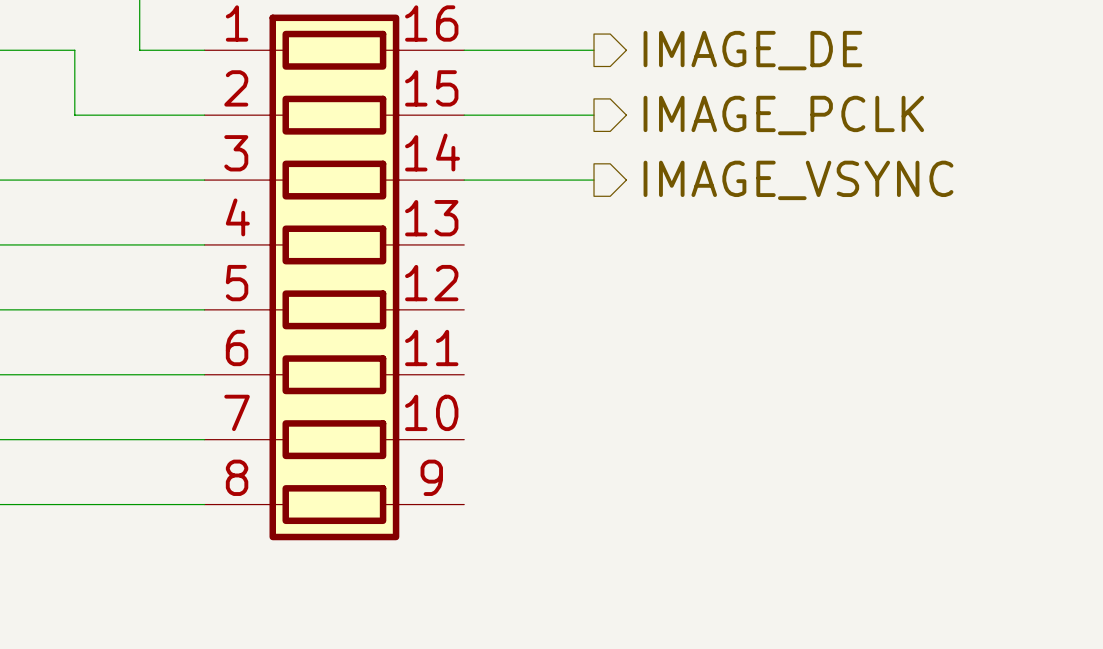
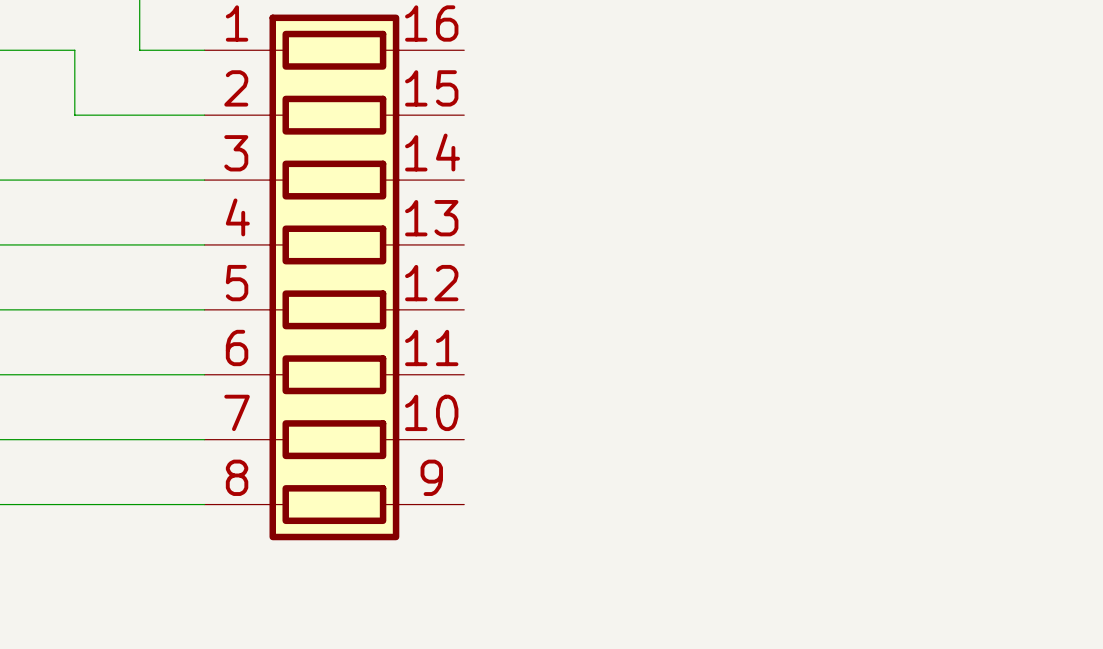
wire: (464, 50) (594, 50) -> none
hierarchical label: IMAGE_DE (752, 50) -> none
wire: (464, 115) (594, 115) -> none
hierarchical label: IMAGE_PCLK (783, 115) -> none
wire: (464, 180) (594, 180) -> none
hierarchical label: IMAGE_VSYNC (798, 180) -> none

